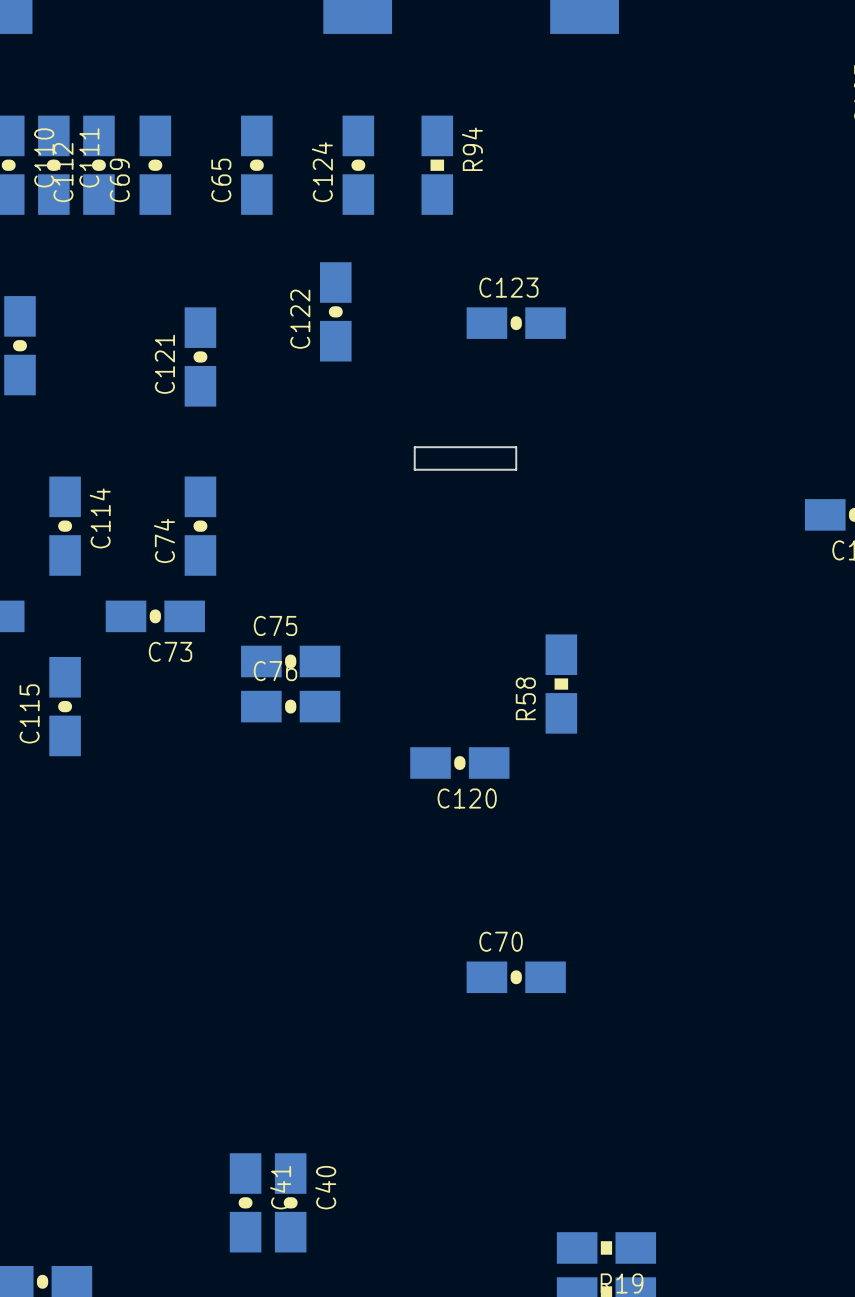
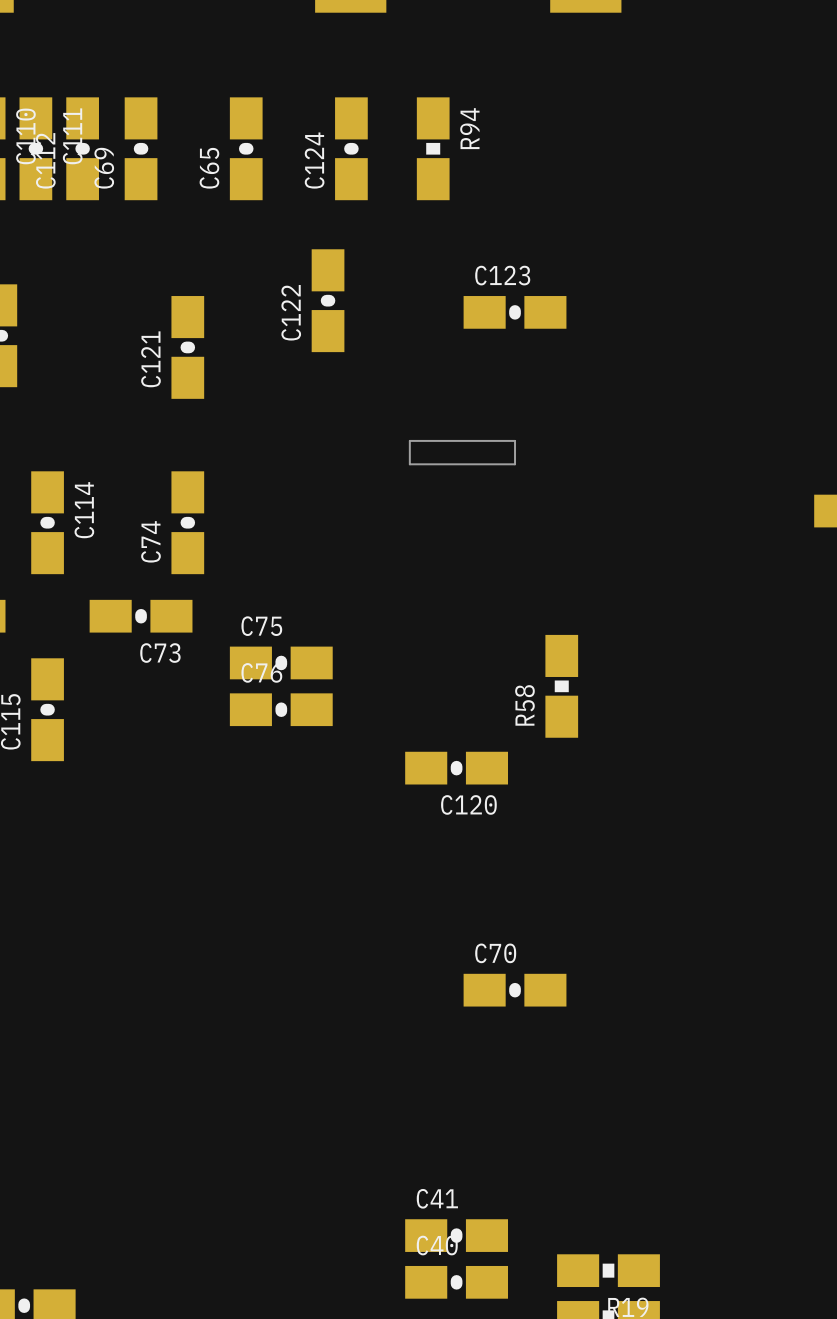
C41 rotation: 0° (245, 1202) -> 90° clockwise (456, 1235)
C41 position: (245, 1202) -> (456, 1235)
C40 rotation: 0° (290, 1202) -> 90° clockwise (456, 1282)
C40 position: (290, 1202) -> (456, 1282)

